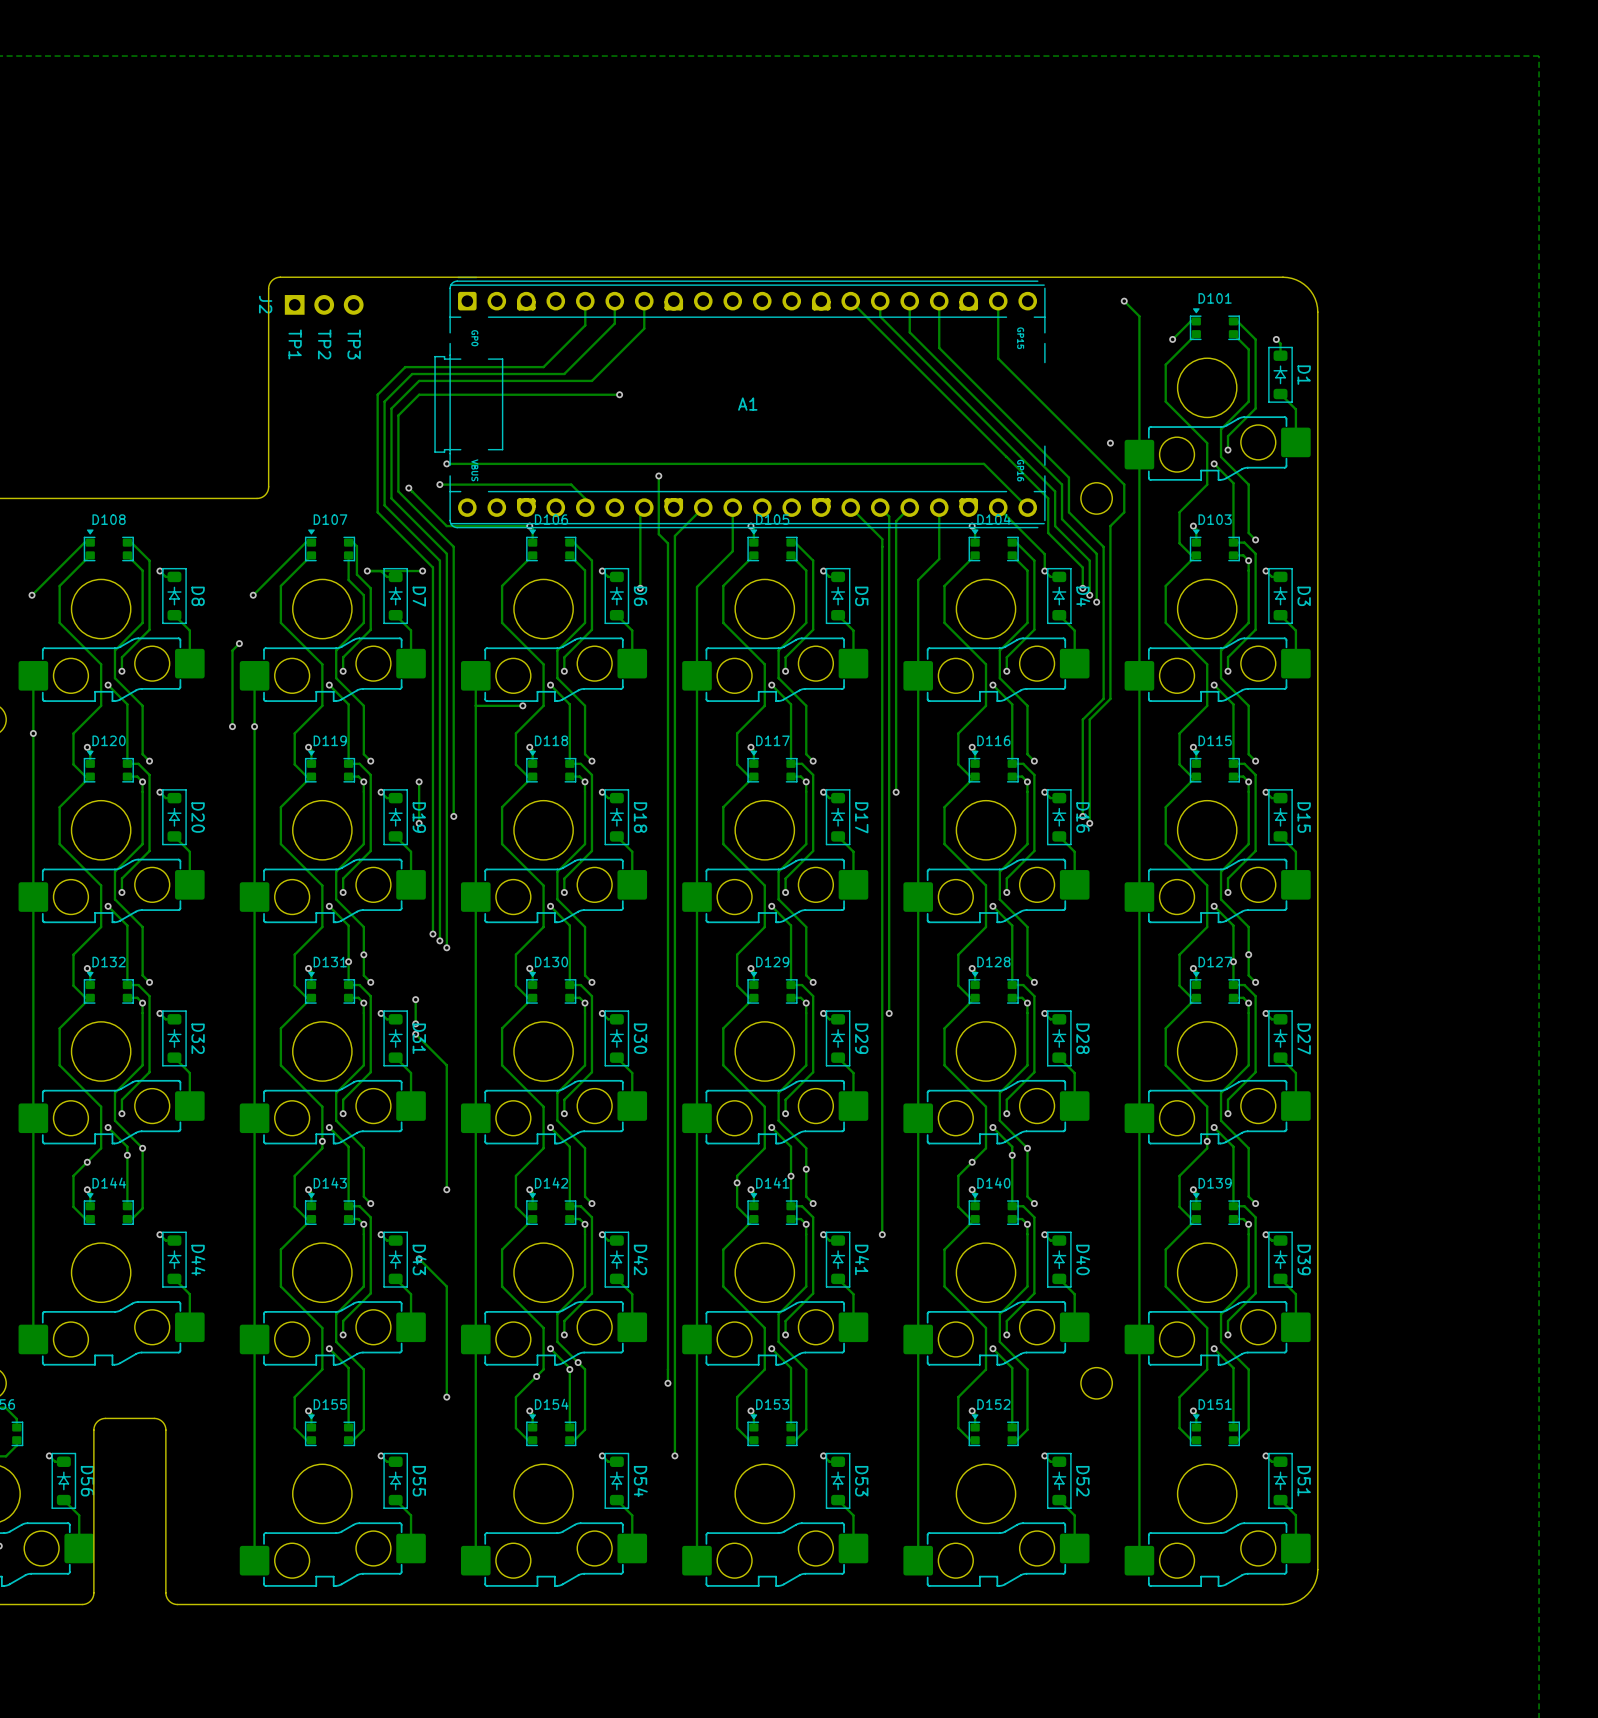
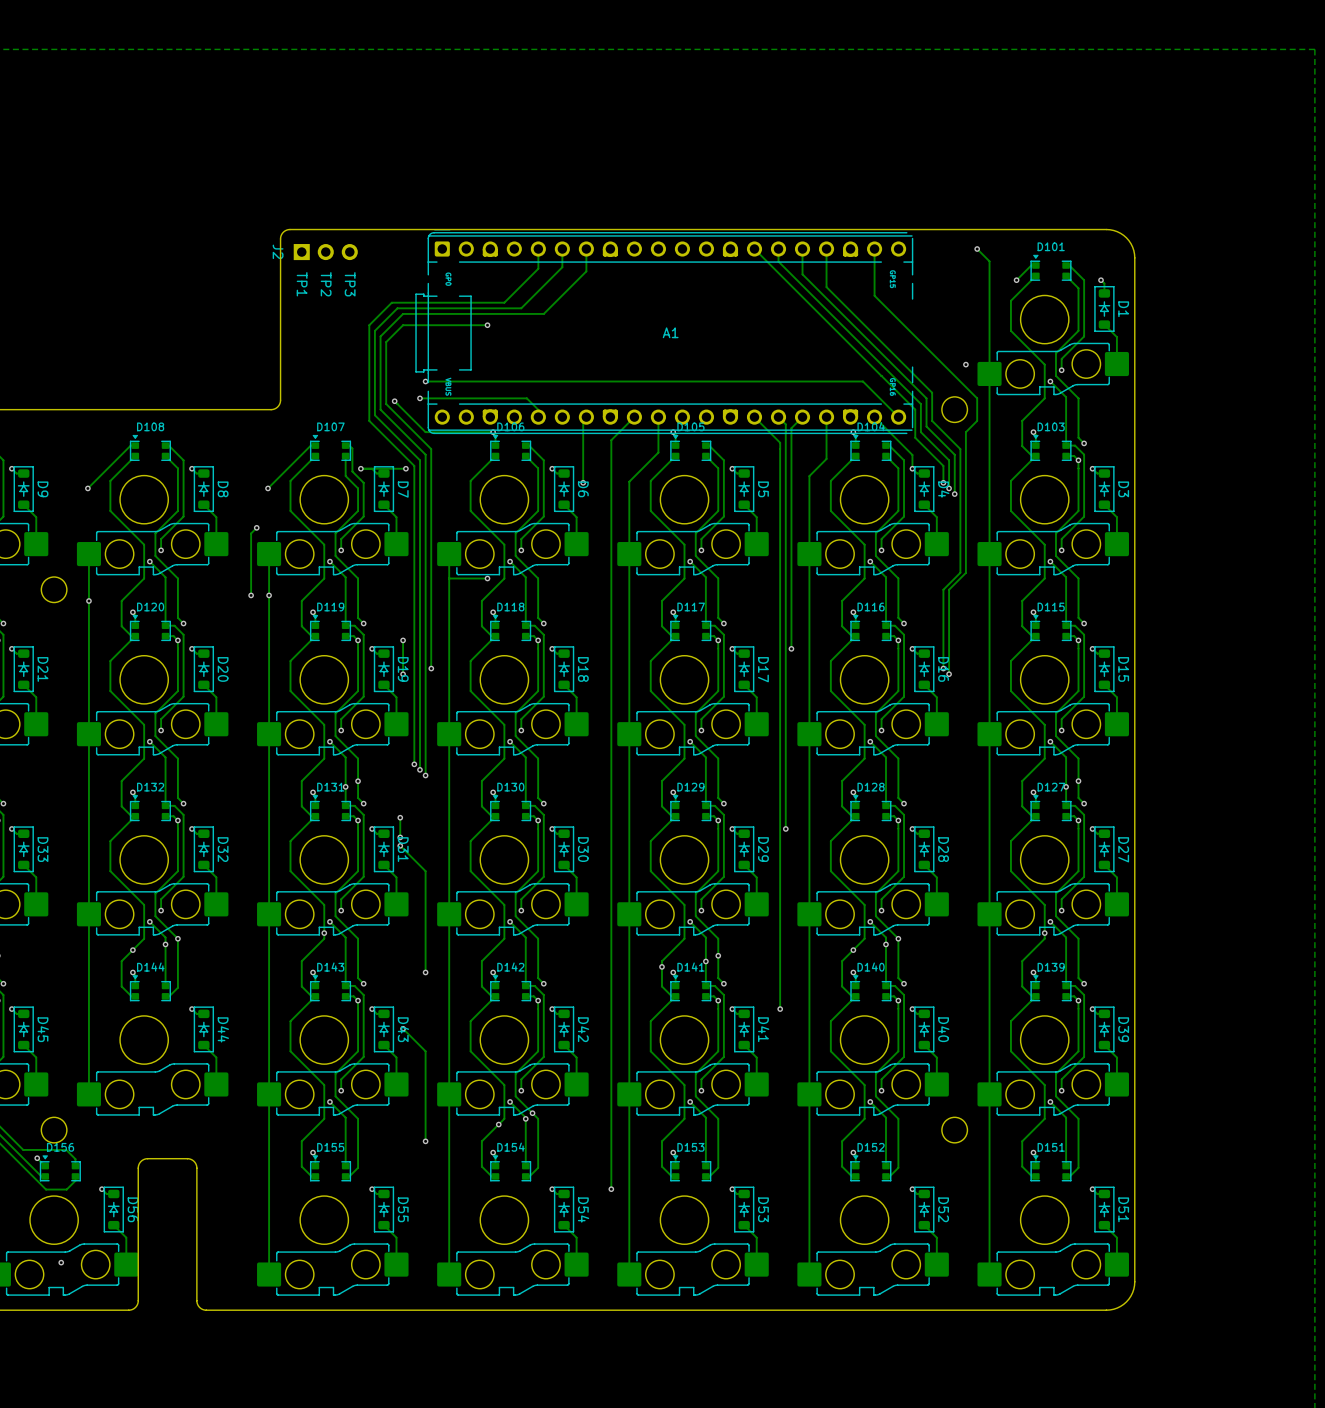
via: none -> (487, 325)
track: (619, 394) (522, 394) -> none
via: (619, 394) -> none
track: (658, 476) (658, 534) (668, 543) (668, 1369) -> none
via: (658, 476) -> none
track: (667, 1369) (667, 1383) -> none
via: (667, 1383) -> none

